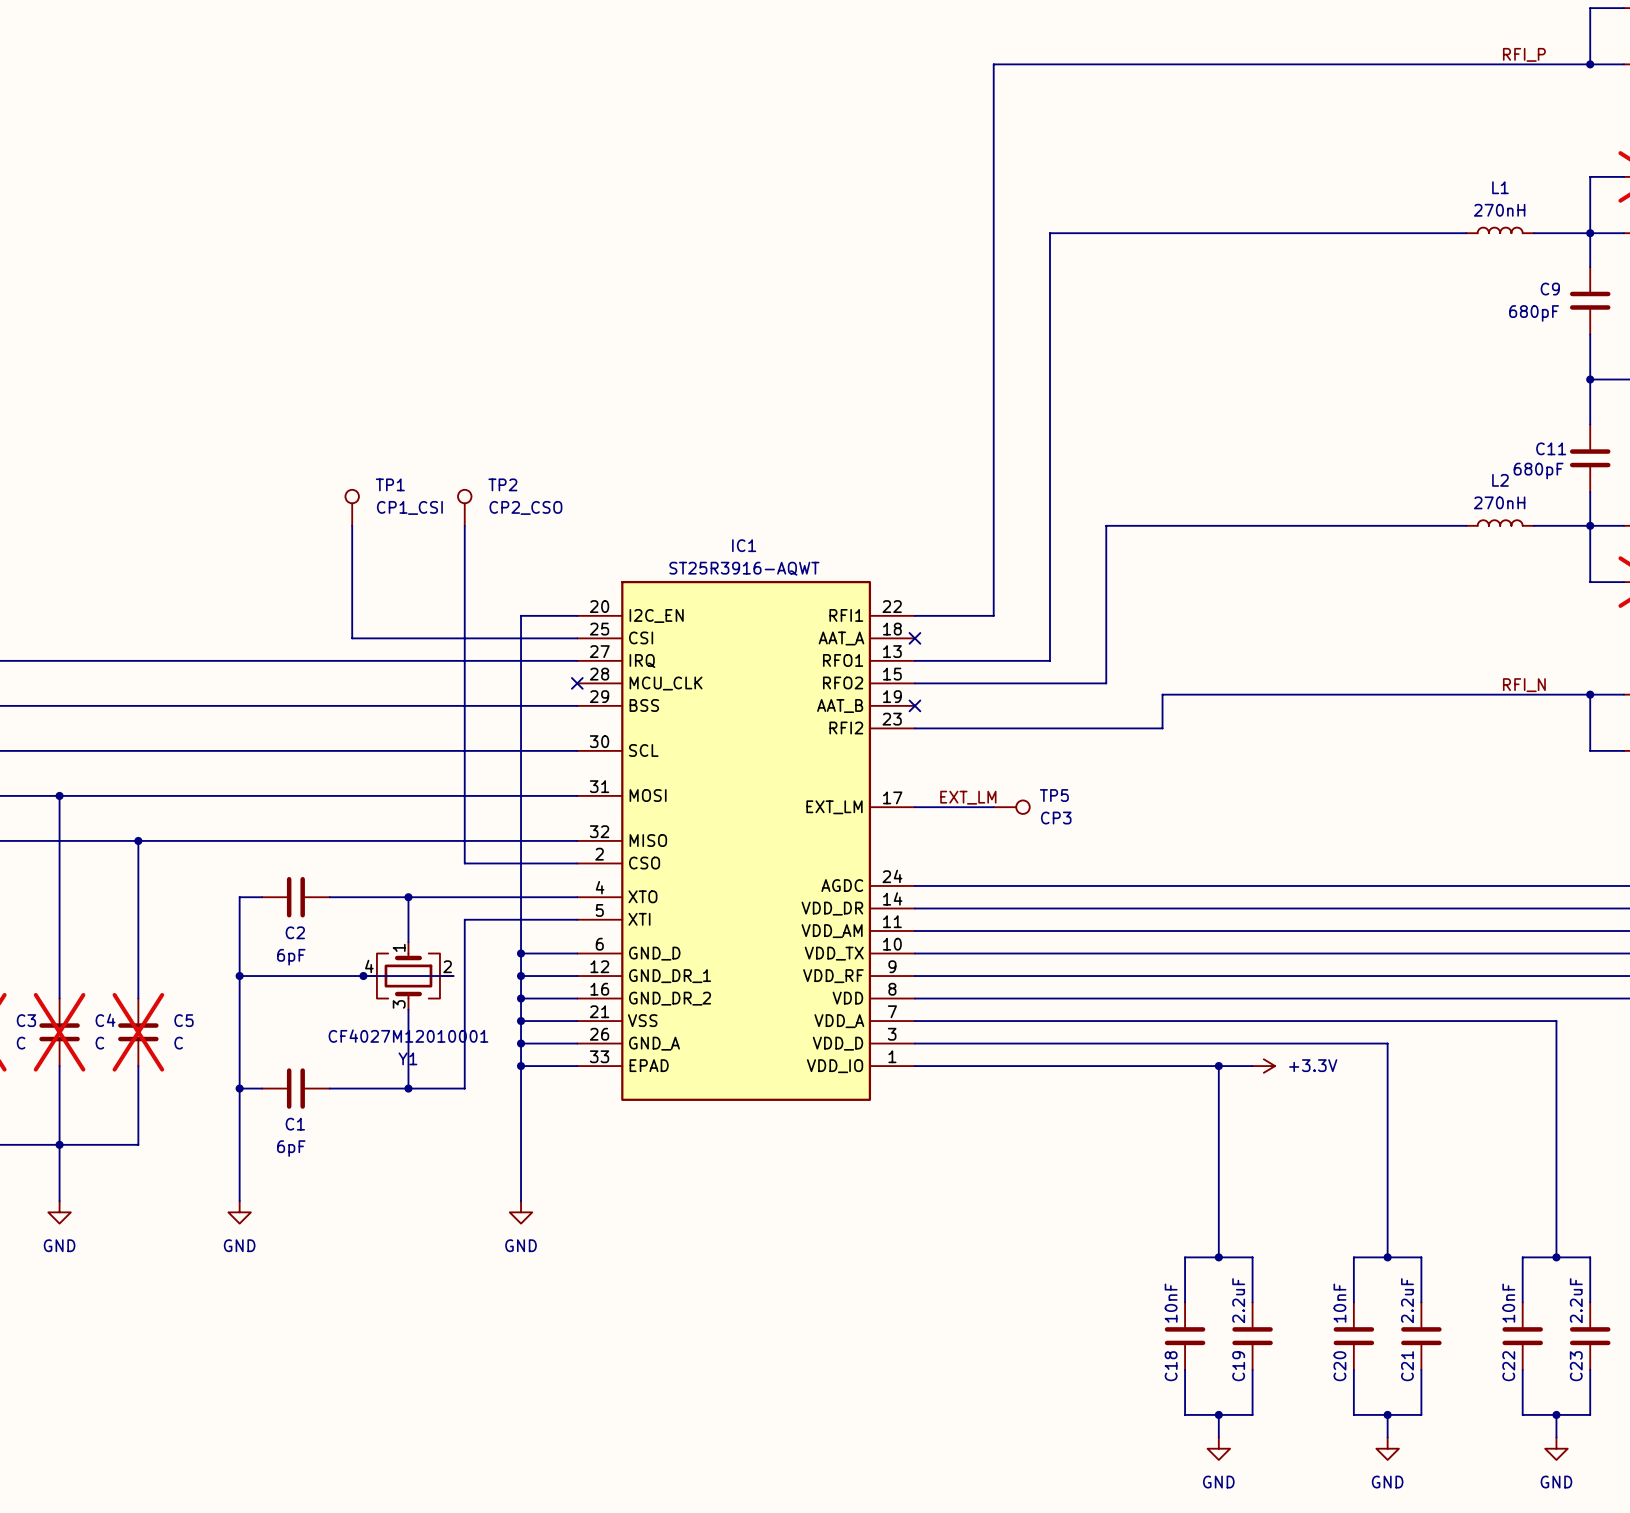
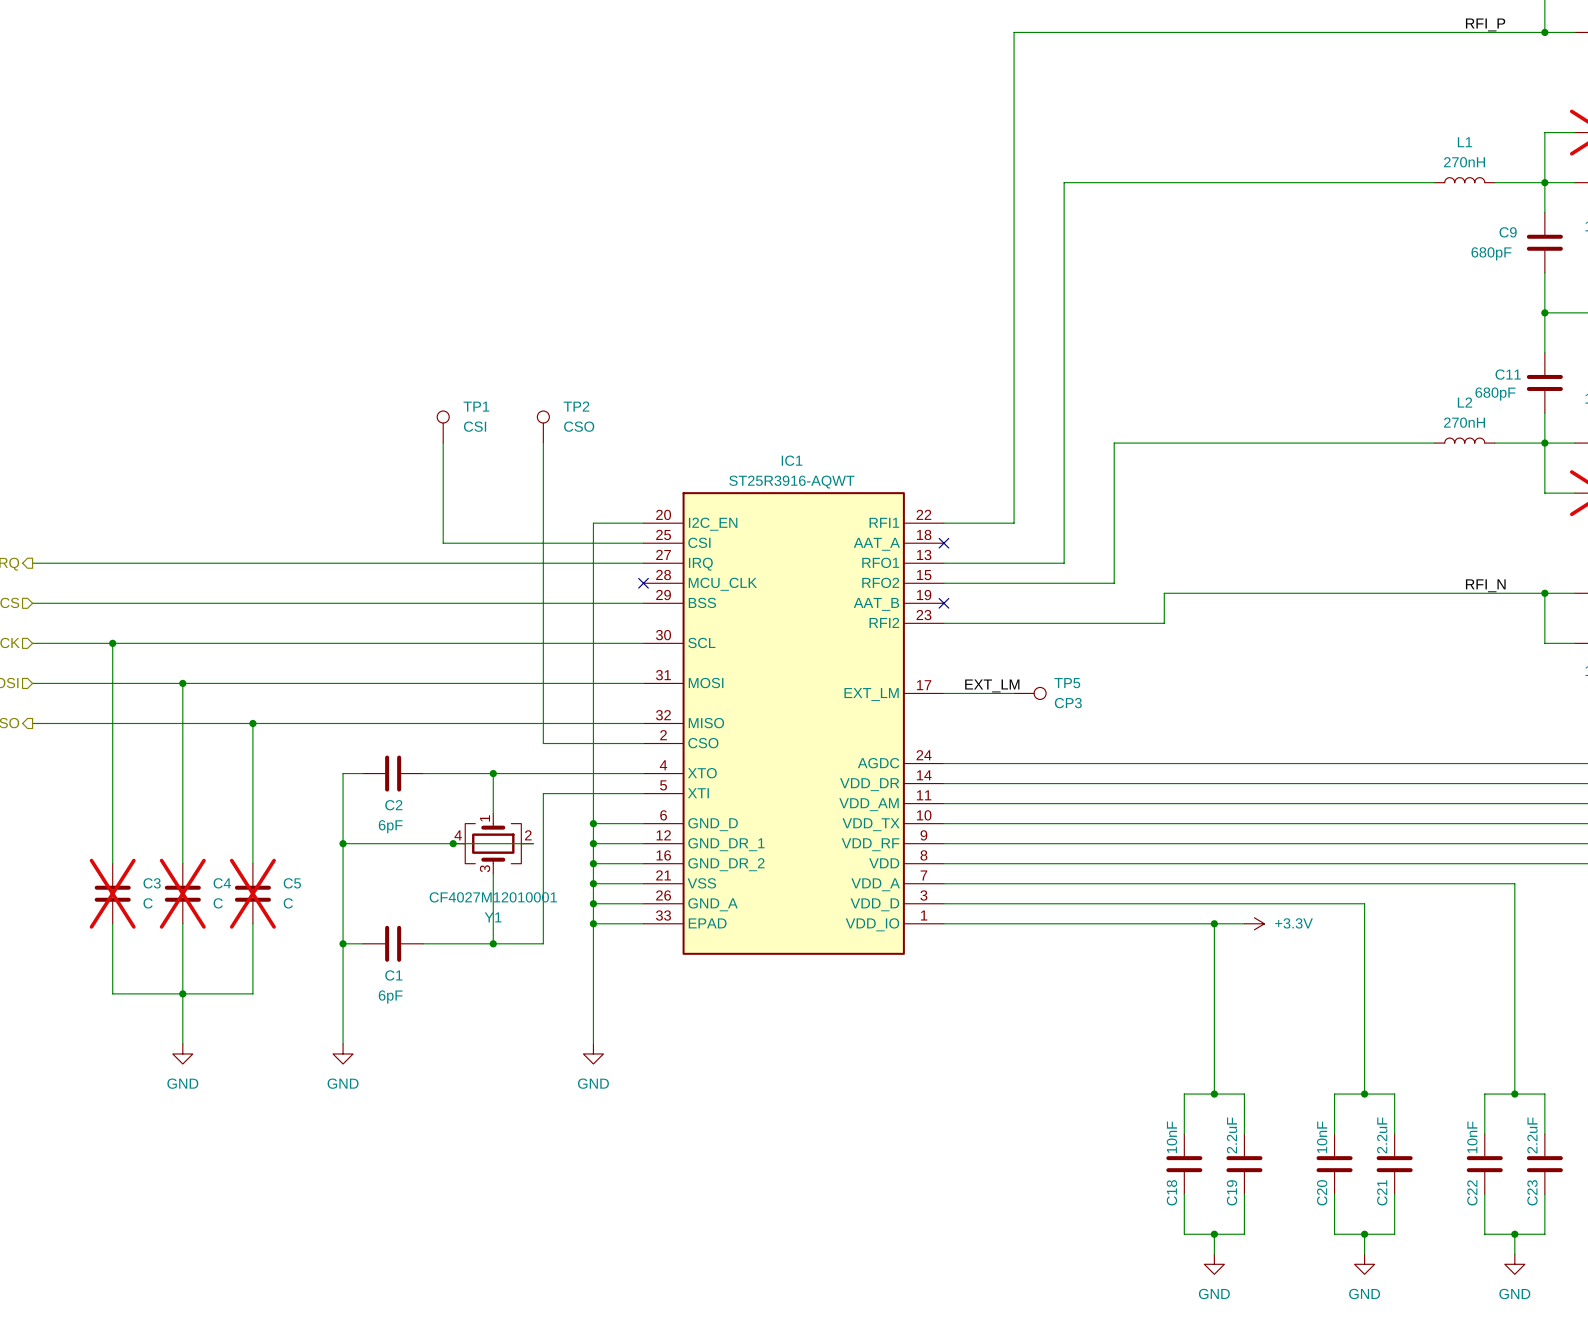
TP1 value: CP1_CSI (409, 507) -> CSI (475, 426)
TP2 value: CP2_CSO (525, 507) -> CSO (579, 426)

